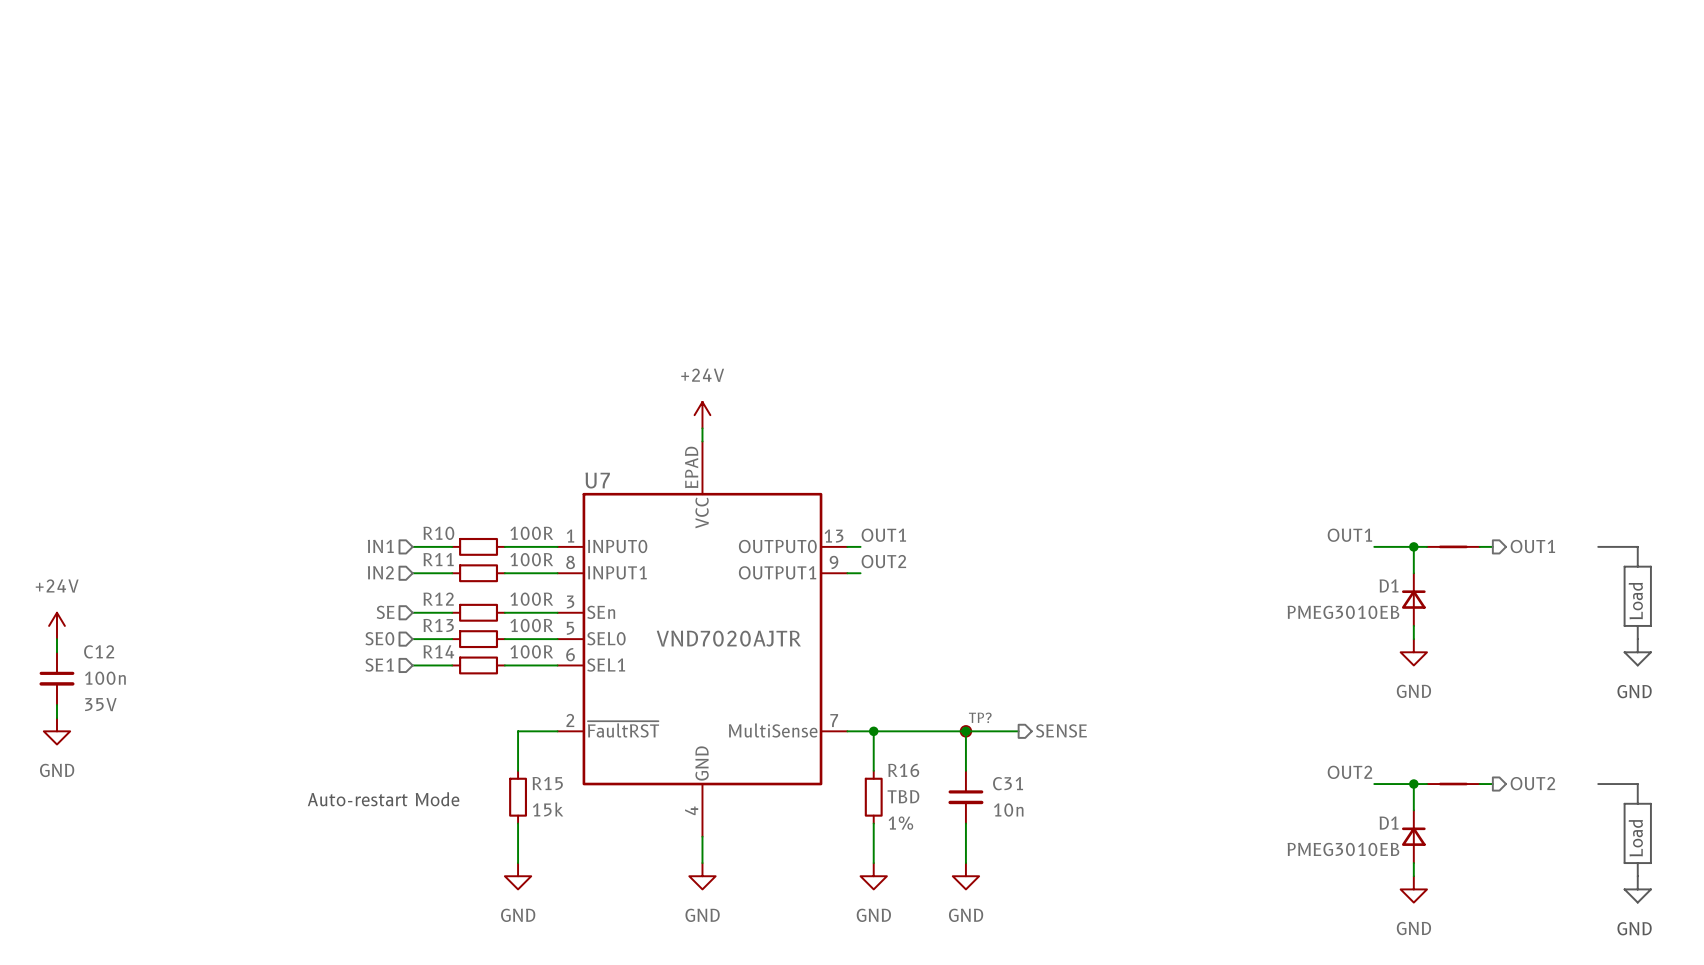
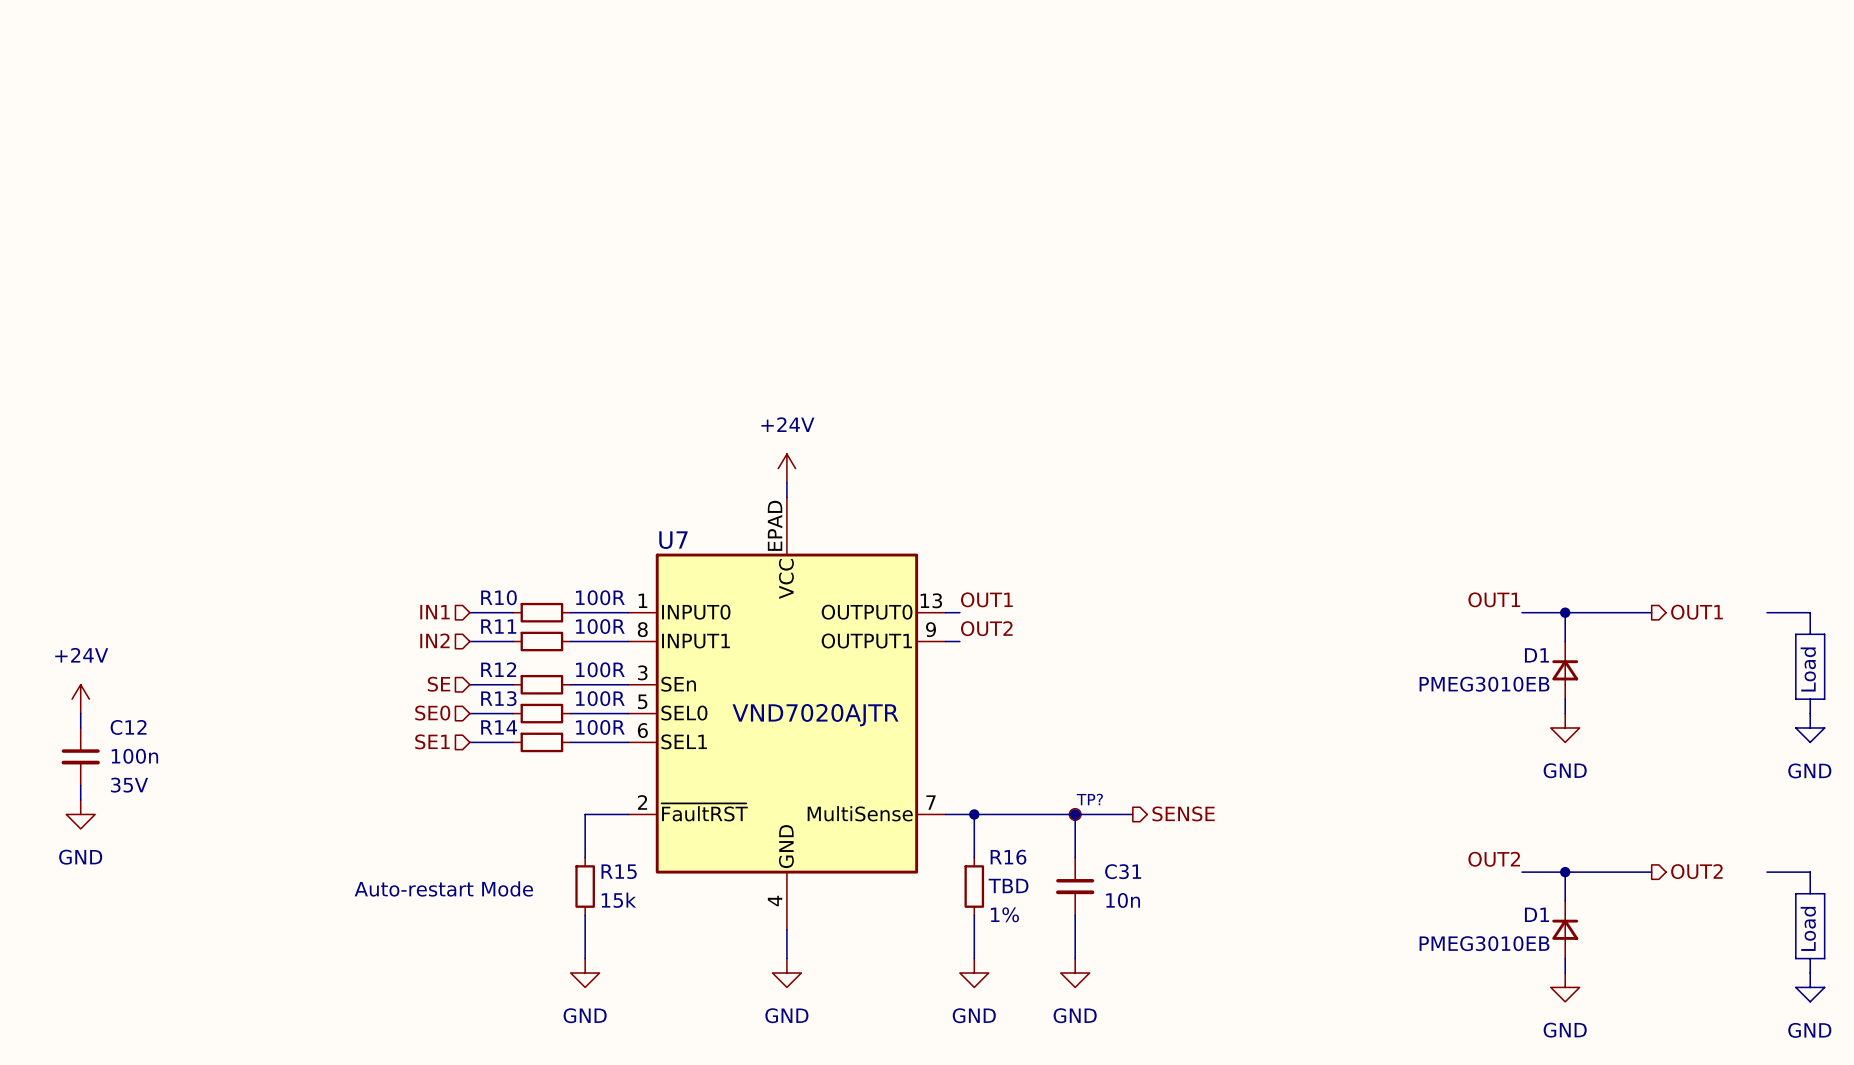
part: (1453, 546) -> none
part: (1453, 784) -> none

